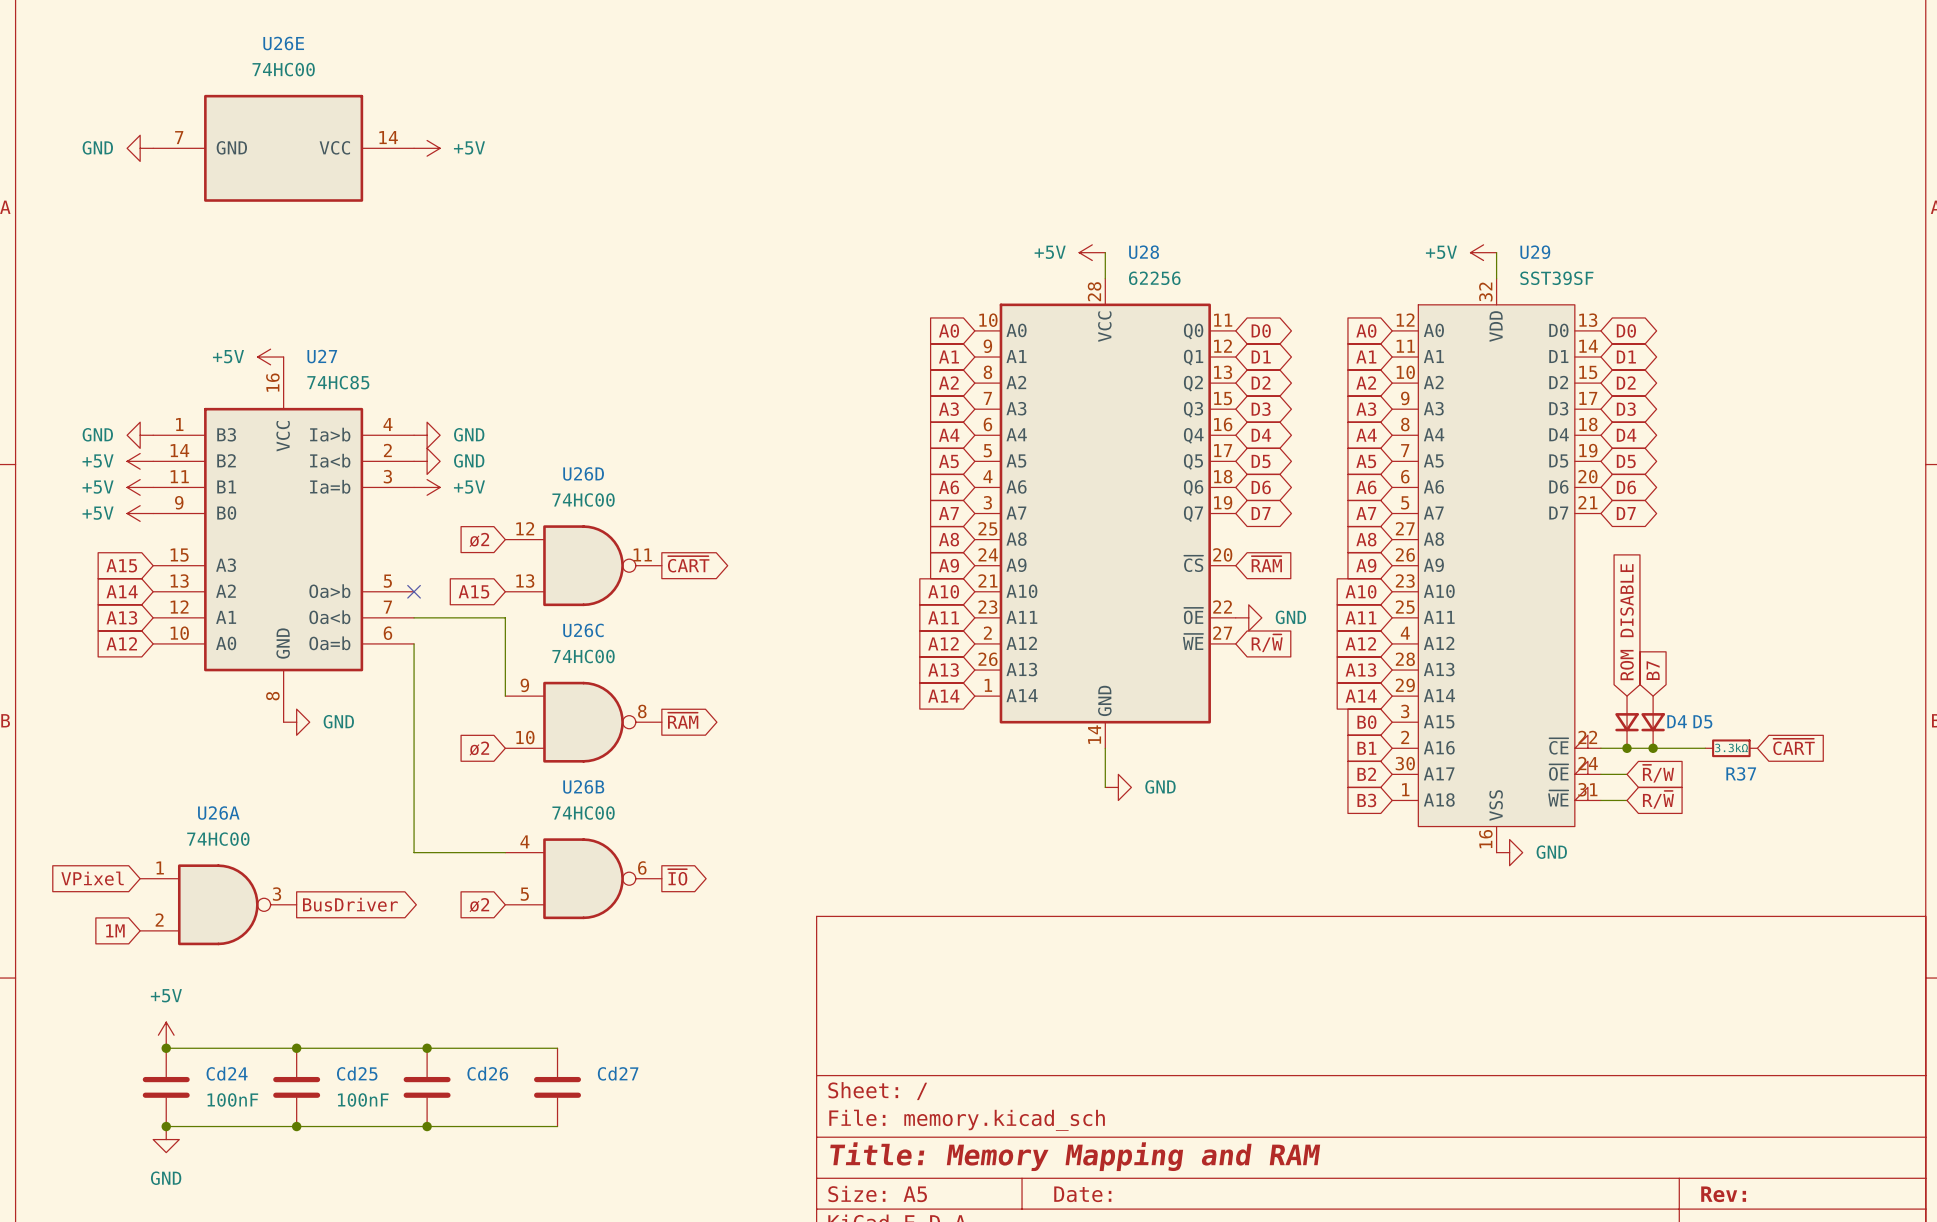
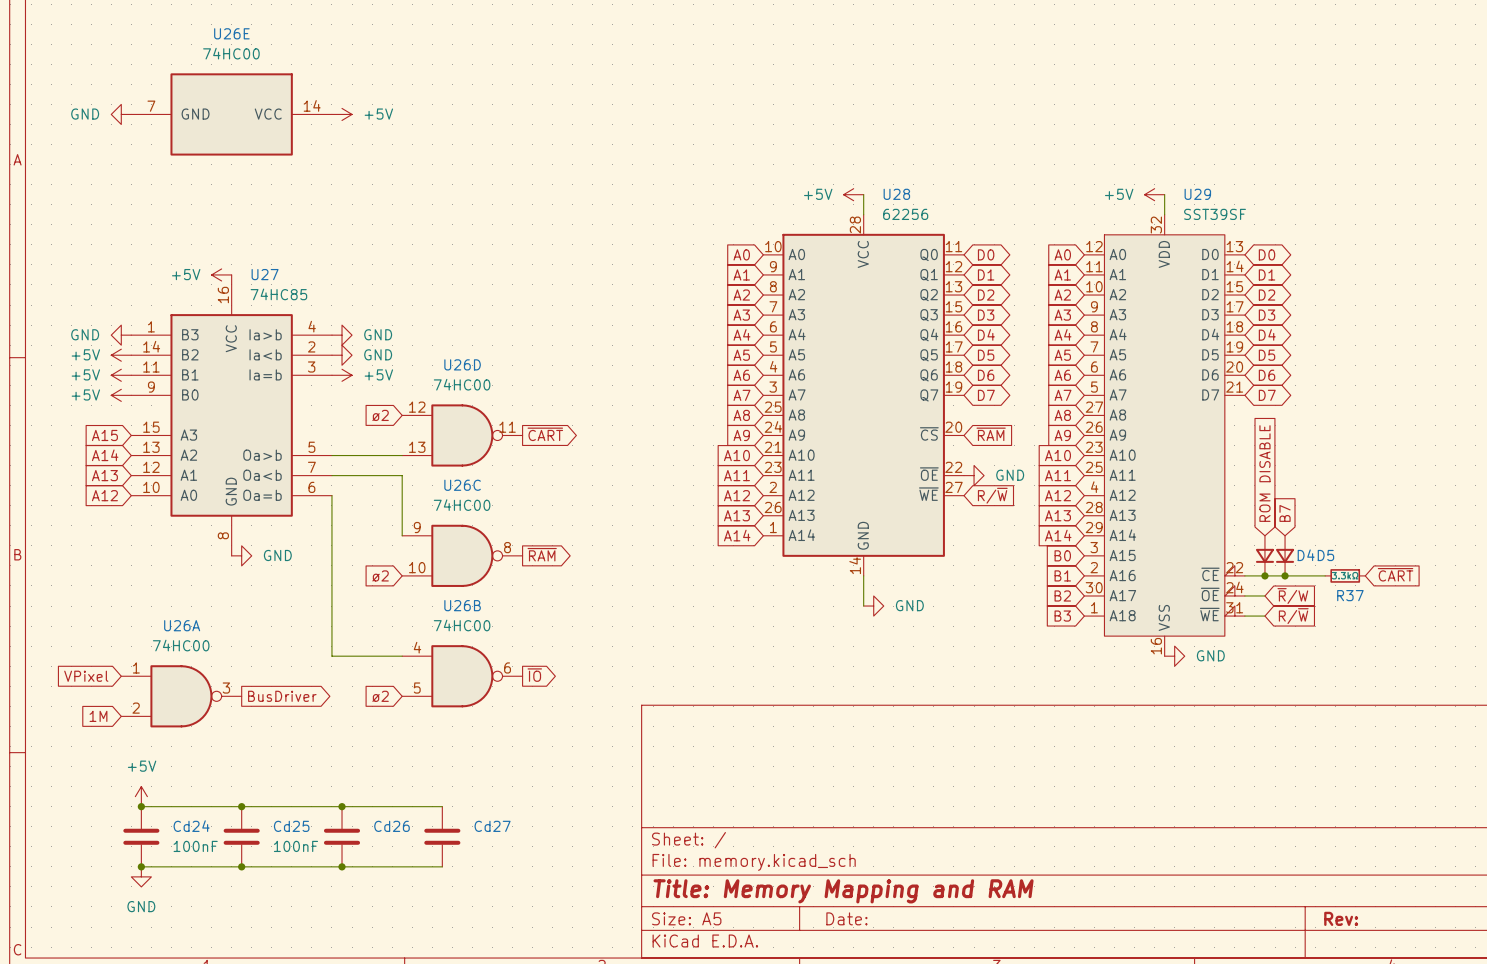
wire: none -> (331, 455) (402, 455)
no-connect mark: (414, 591) -> none
global label: A15 (473, 591) -> none

